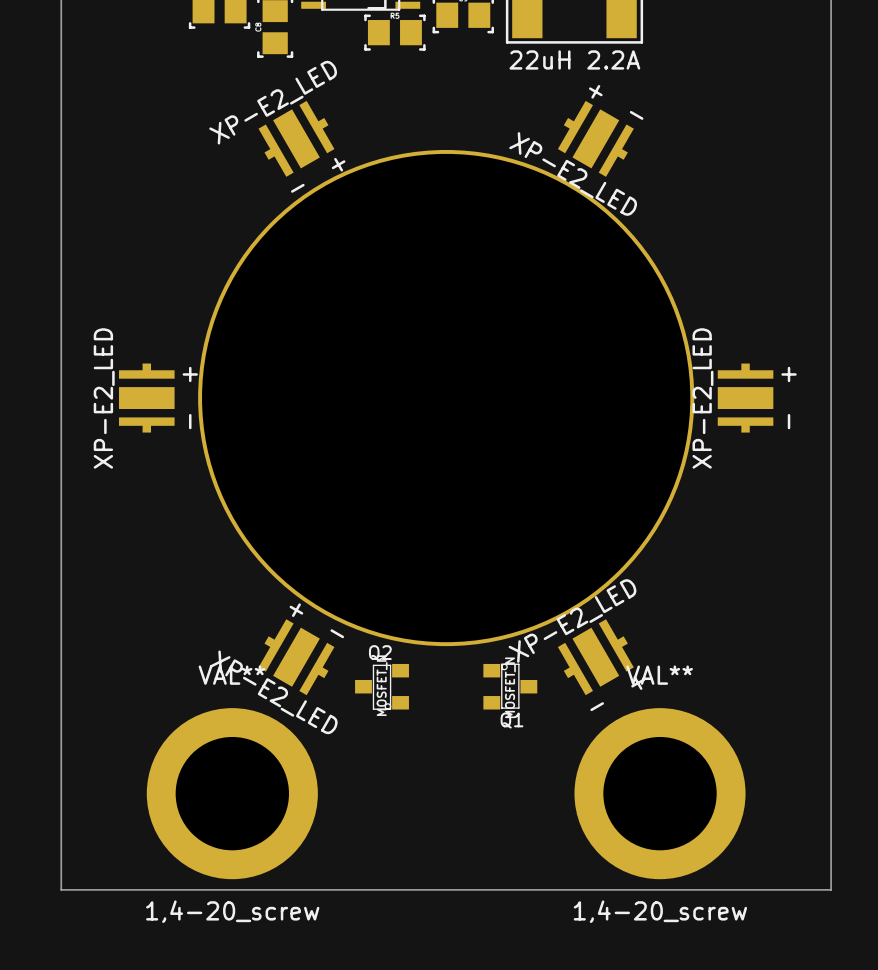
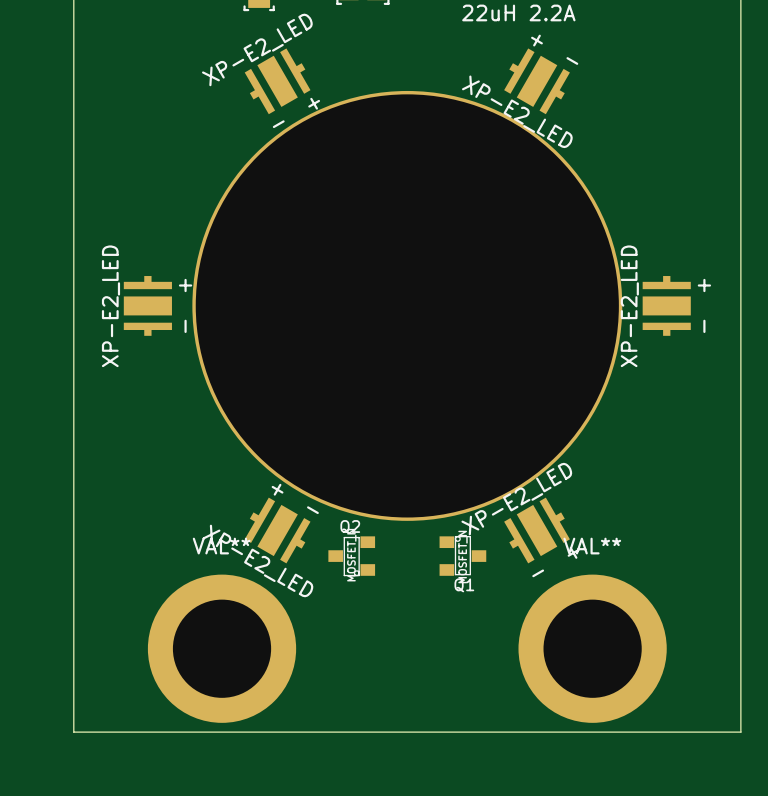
1,4-20_screw name: 1,4-20_screw (232, 911) -> none
1,4-20_screw name: 1,4-20_screw (660, 911) -> none

